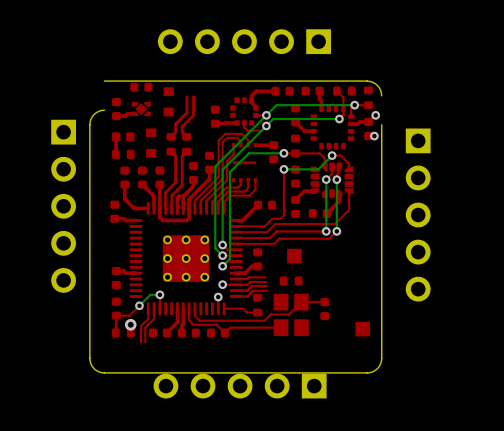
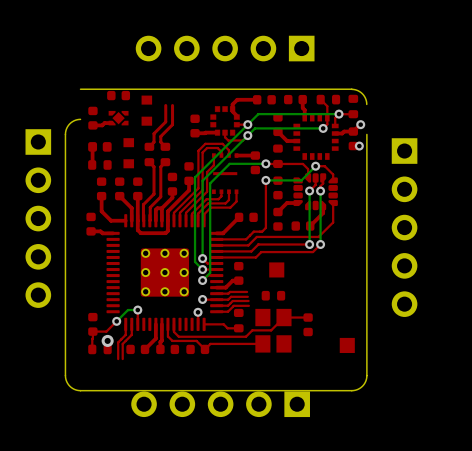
top track: (116, 271) (136, 273) -> none
part: (116, 278) -> none

